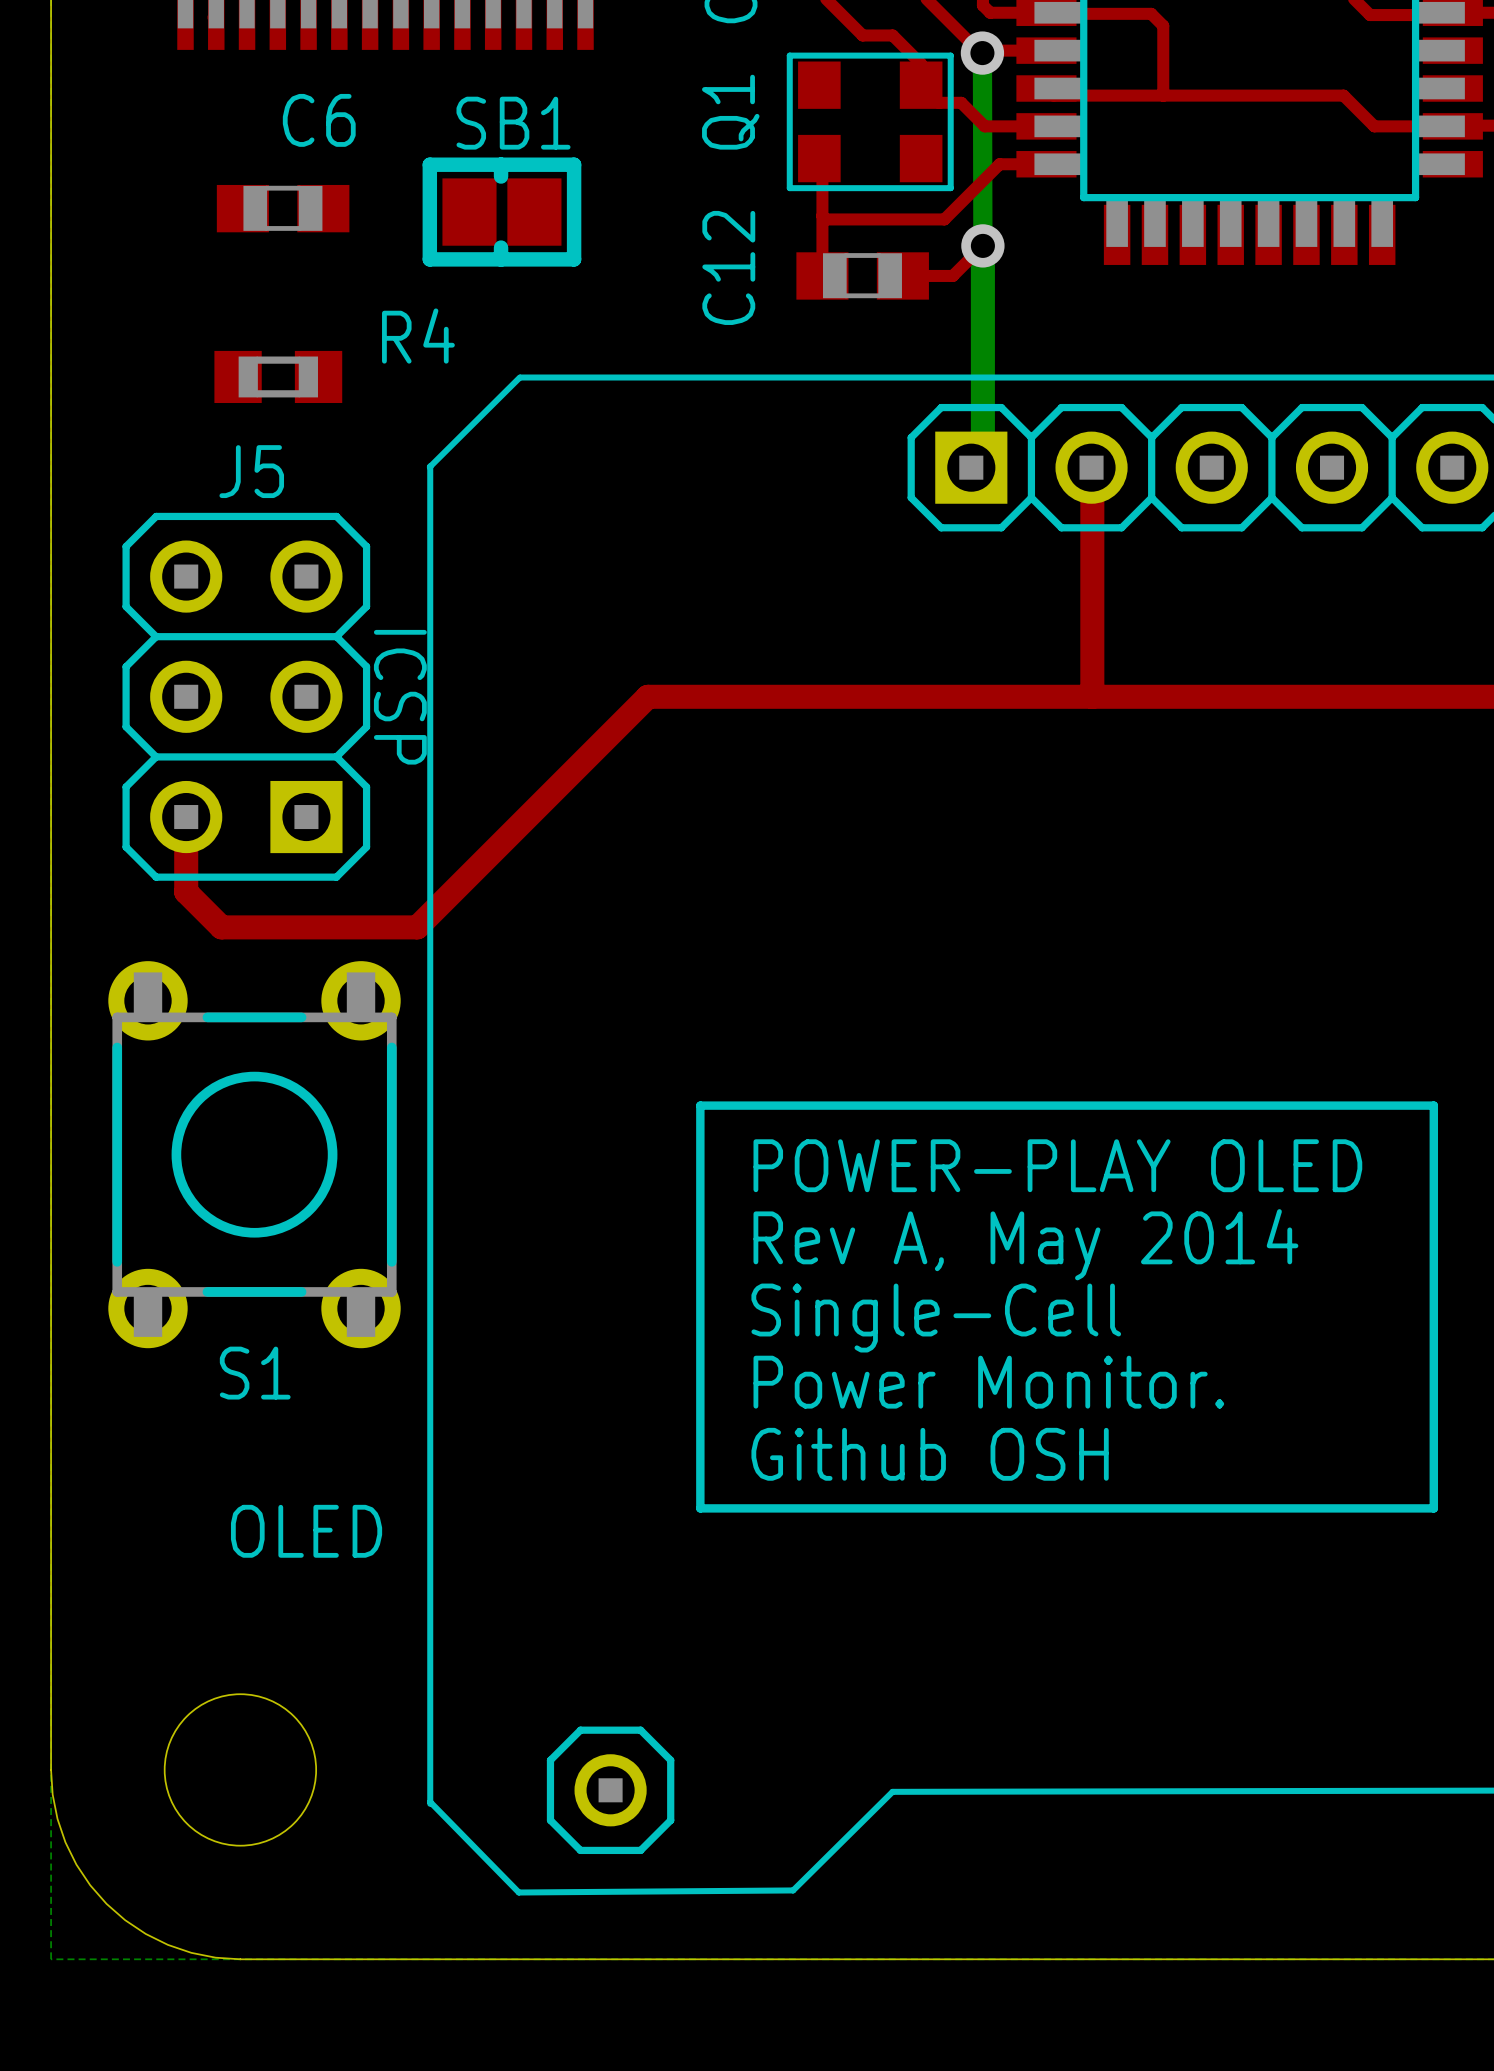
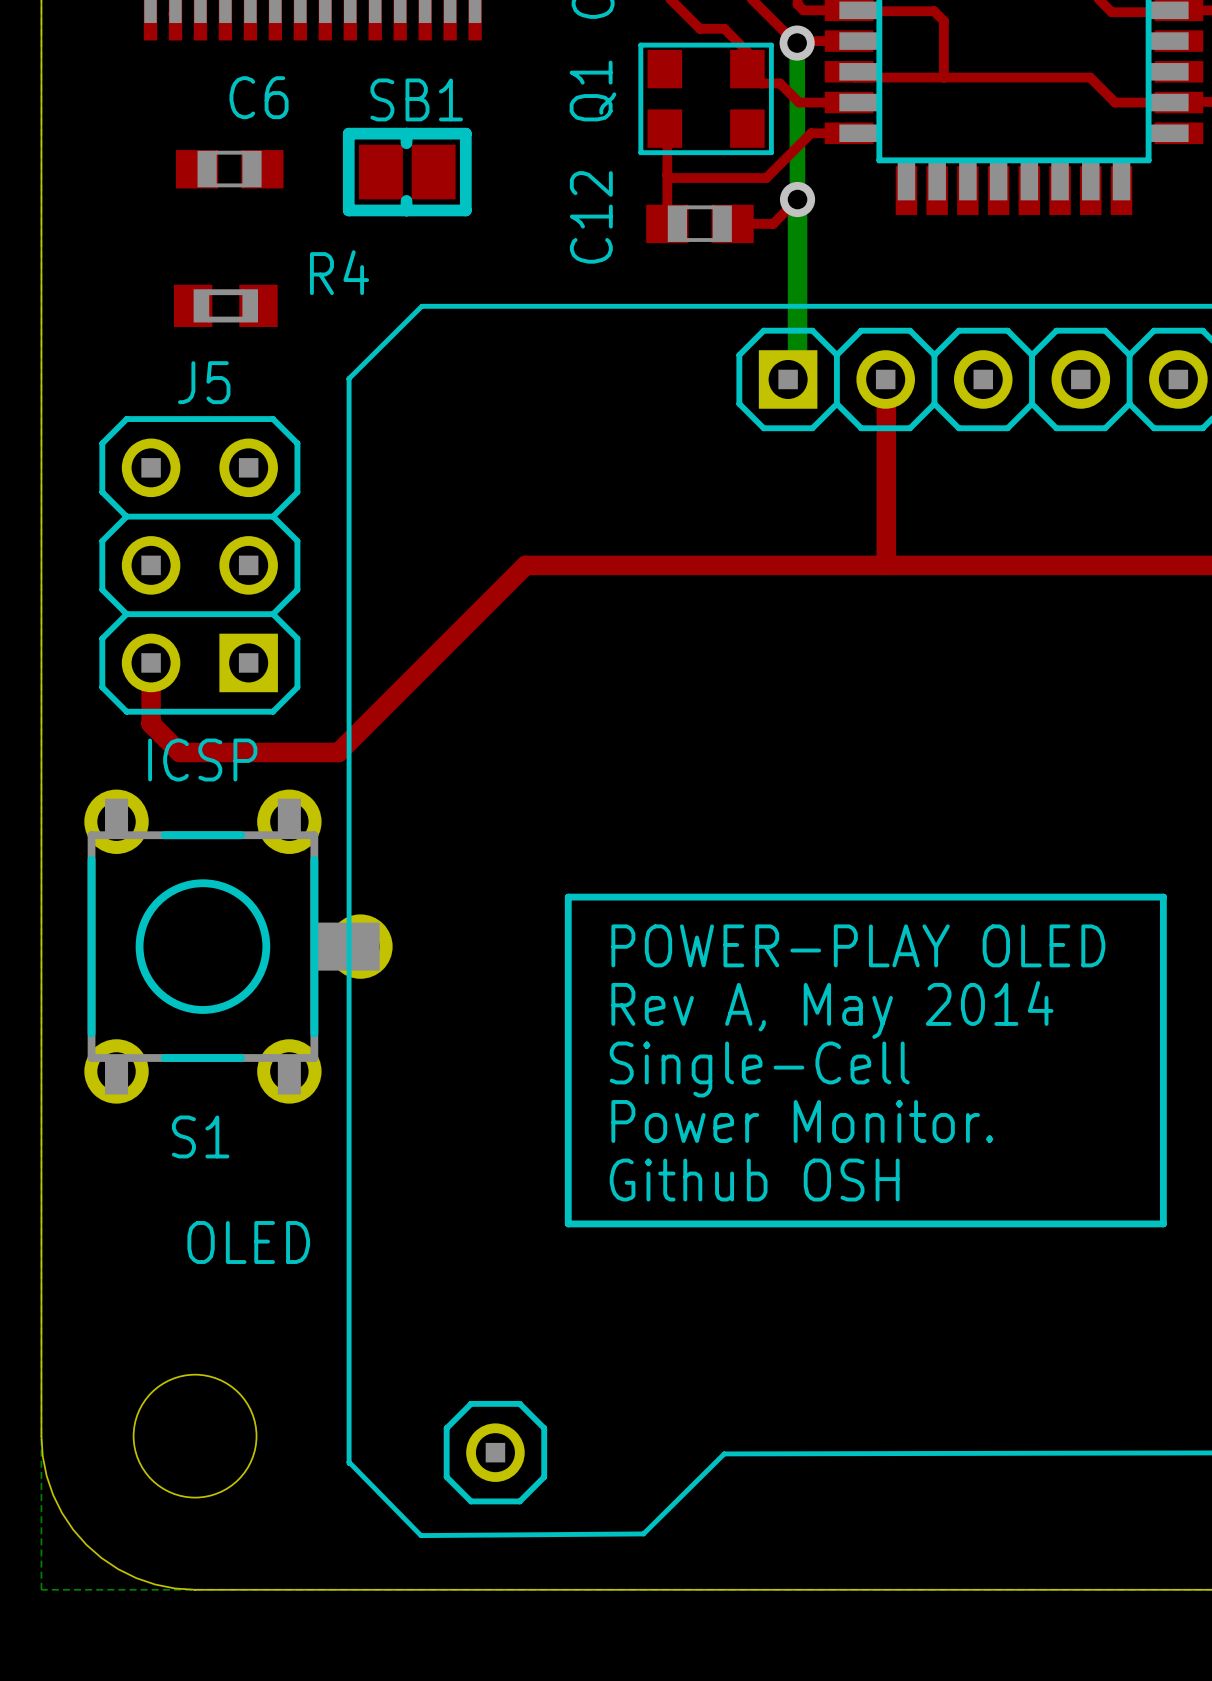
text rotation: 0° (400, 697) -> 90° counterclockwise (202, 760)
text position: ICSP (400, 697) -> ICSP (202, 760)
S1 footprint: [108, 961, 401, 1349] -> [84, 789, 393, 1104]

